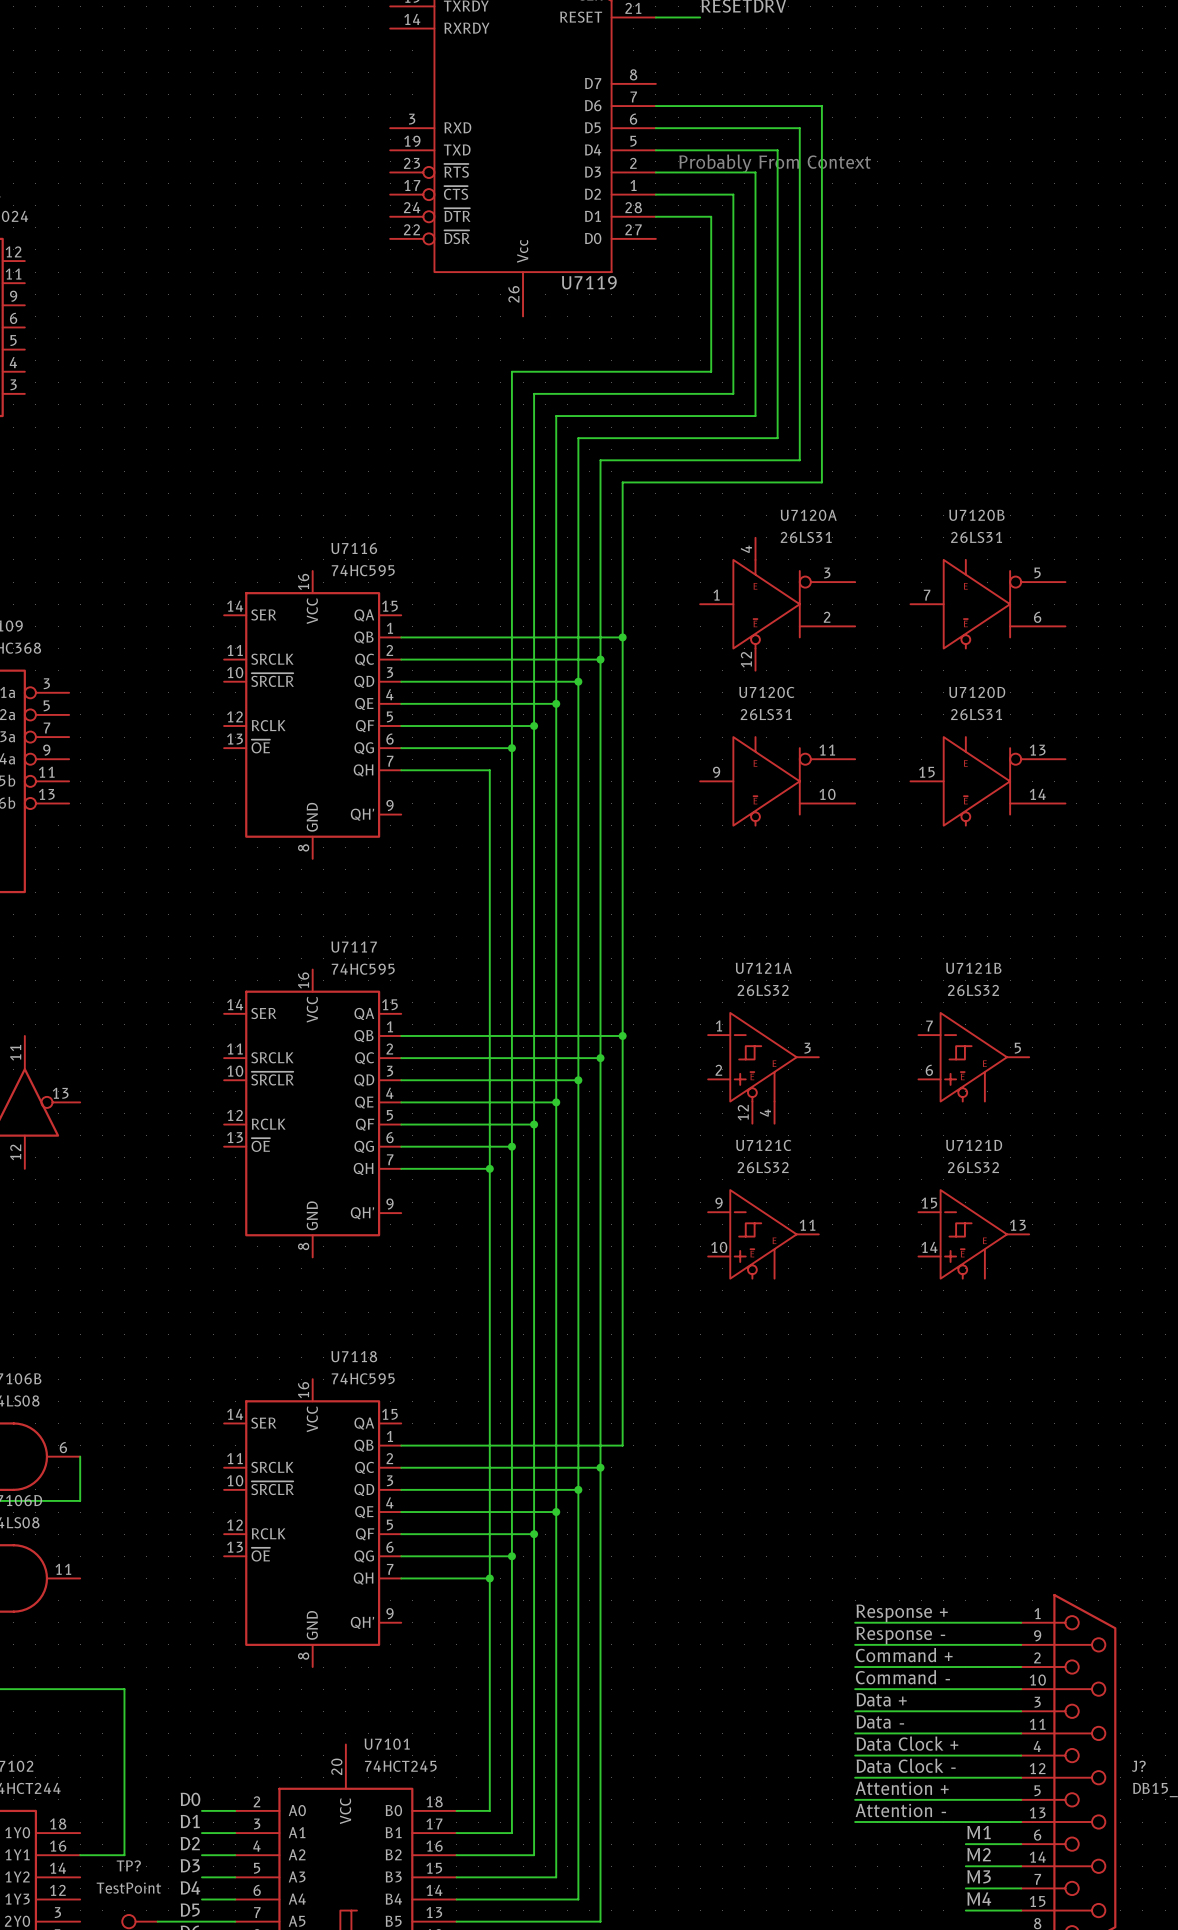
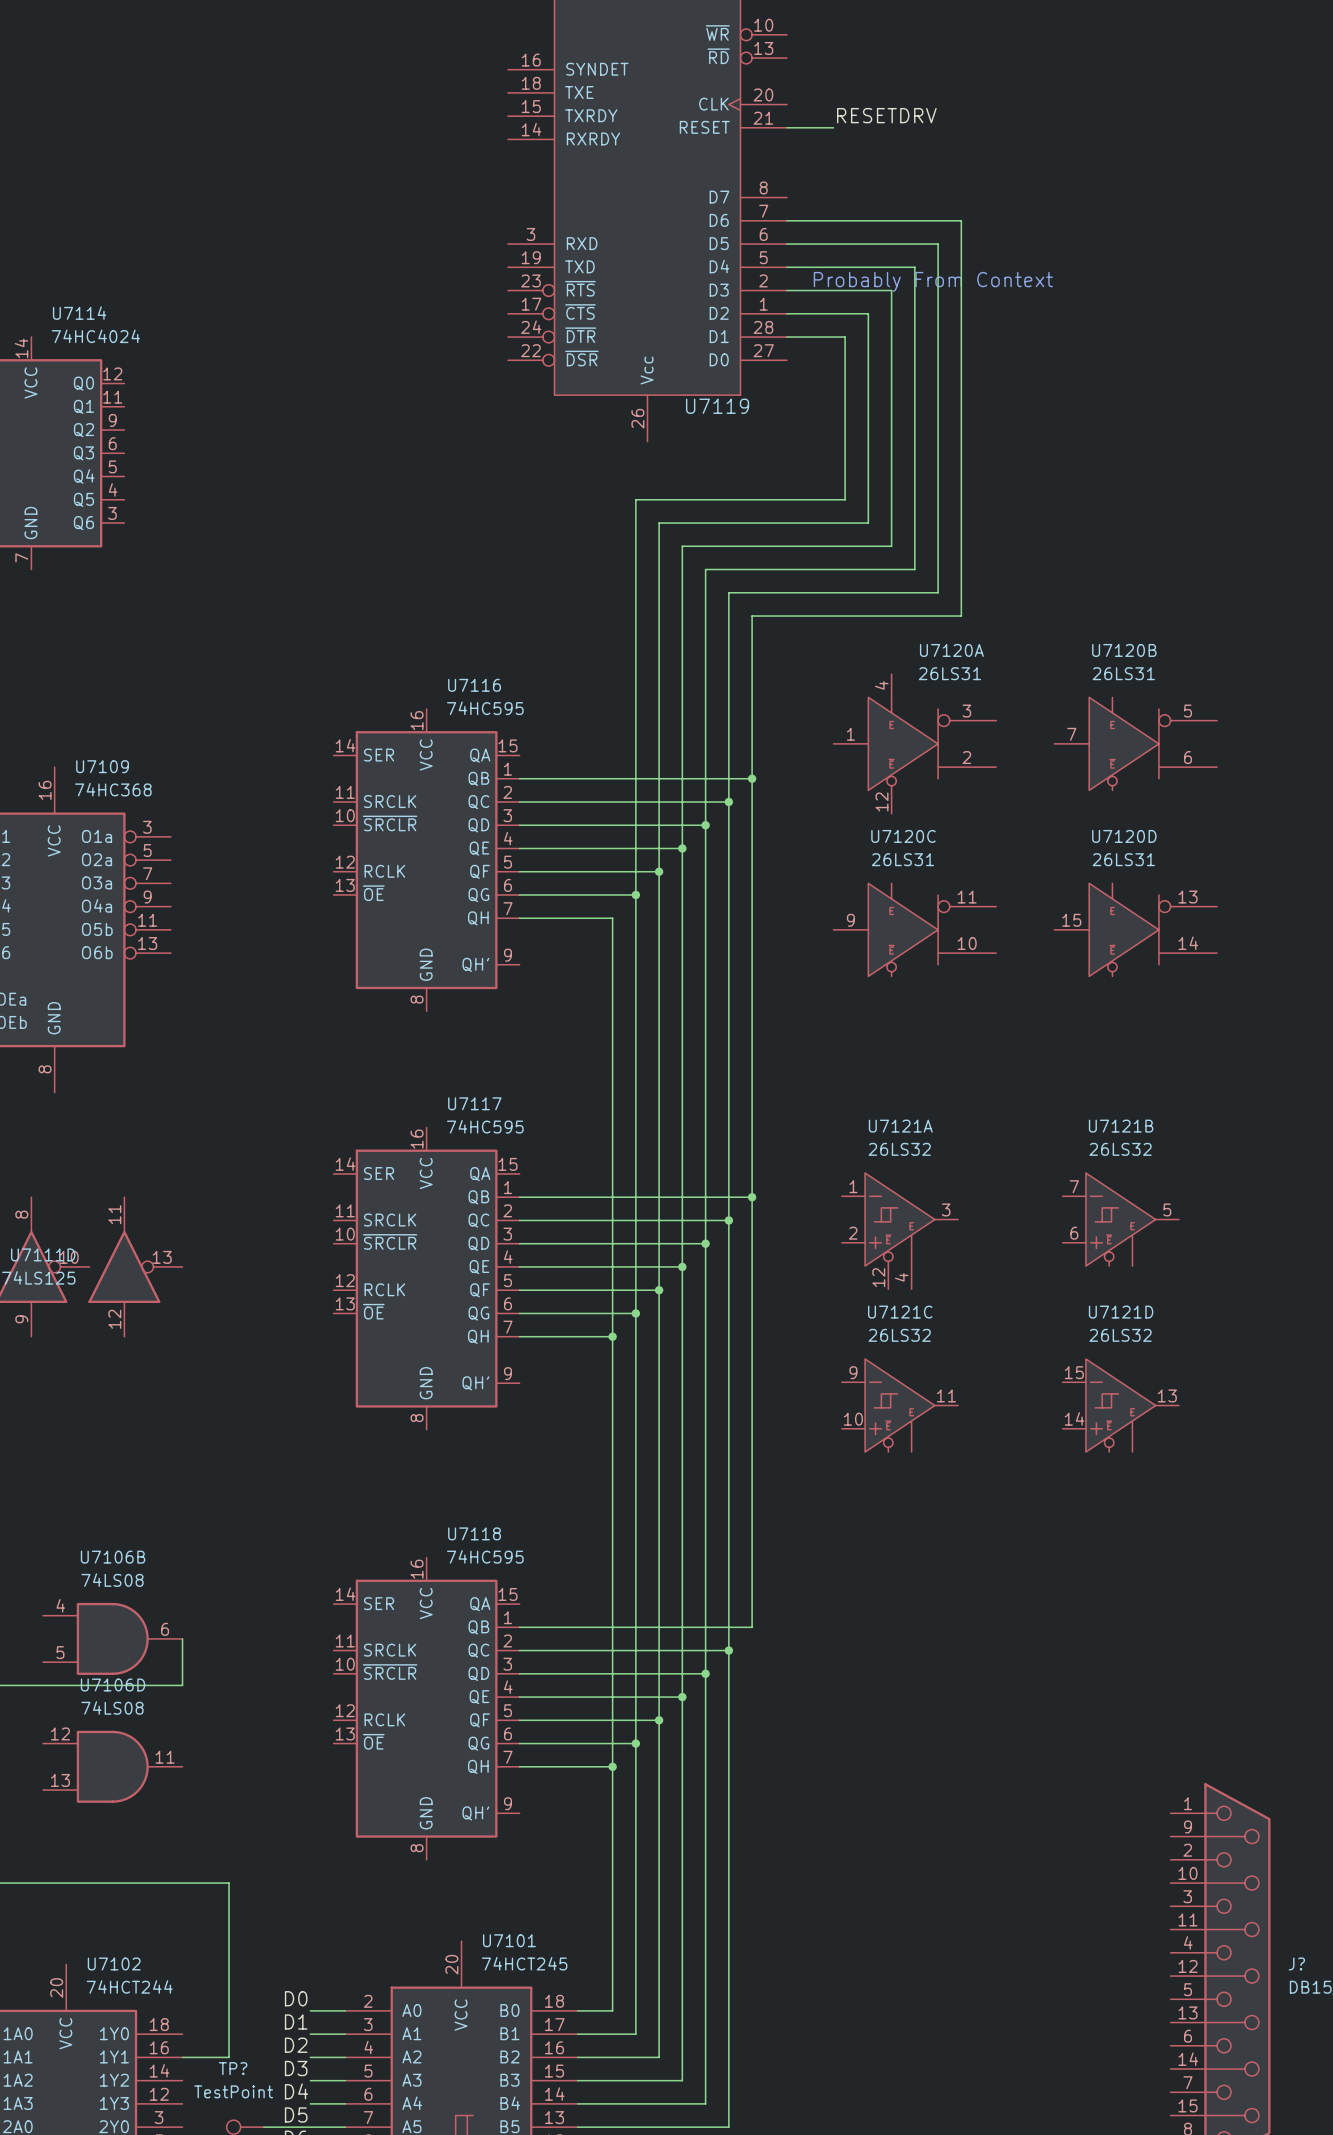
label: Response + (902, 1613) -> none
wire: (855, 1622) (1021, 1622) -> none
label: Response - (900, 1635) -> none
wire: (855, 1644) (1021, 1644) -> none
label: Command + (904, 1655) -> none
wire: (855, 1667) (1021, 1667) -> none
label: Command - (902, 1677) -> none
wire: (855, 1689) (1021, 1689) -> none
label: Data + (881, 1699) -> none
wire: (855, 1711) (1021, 1711) -> none
label: Data - (880, 1721) -> none
wire: (855, 1733) (1021, 1733) -> none
label: Data Clock + (907, 1743) -> none
wire: (855, 1755) (1021, 1755) -> none
label: Data Clock - (906, 1765) -> none
wire: (855, 1777) (1021, 1777) -> none
label: Attention + (902, 1788) -> none
wire: (855, 1799) (1021, 1799) -> none
label: Attention - (900, 1810) -> none
wire: (855, 1822) (1021, 1822) -> none
label: M1 (979, 1832) -> none
wire: (965, 1844) (1021, 1844) -> none
label: M2 (979, 1854) -> none
wire: (965, 1866) (1021, 1866) -> none
label: M3 (979, 1876) -> none
wire: (965, 1888) (1021, 1888) -> none
label: M4 (979, 1898) -> none
wire: (965, 1910) (1021, 1910) -> none

